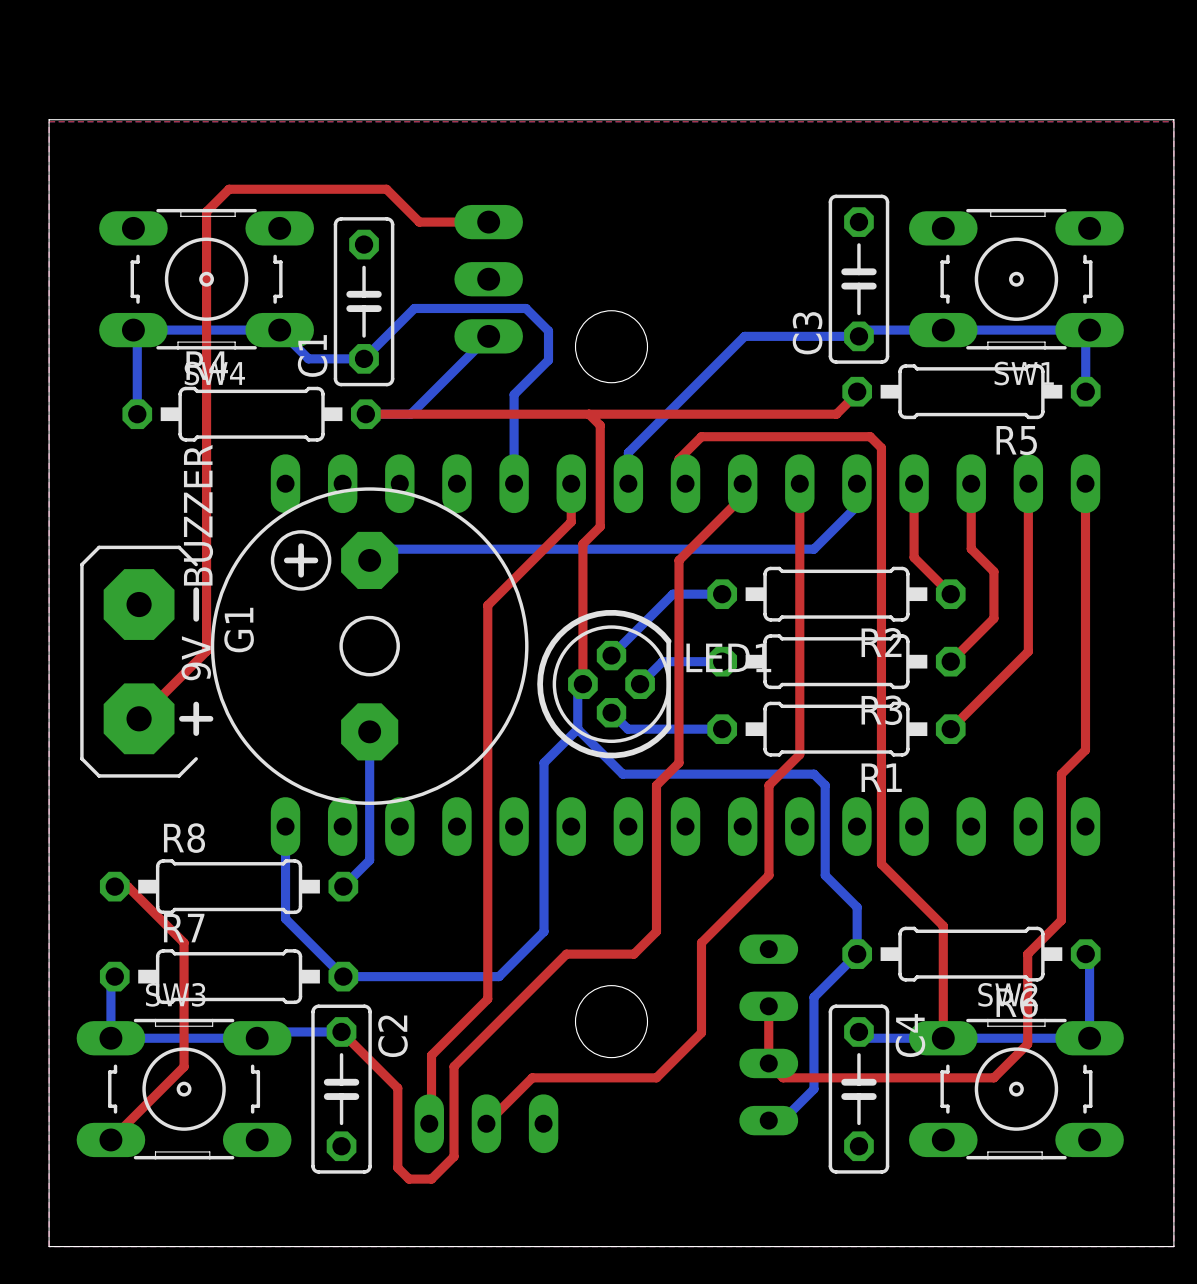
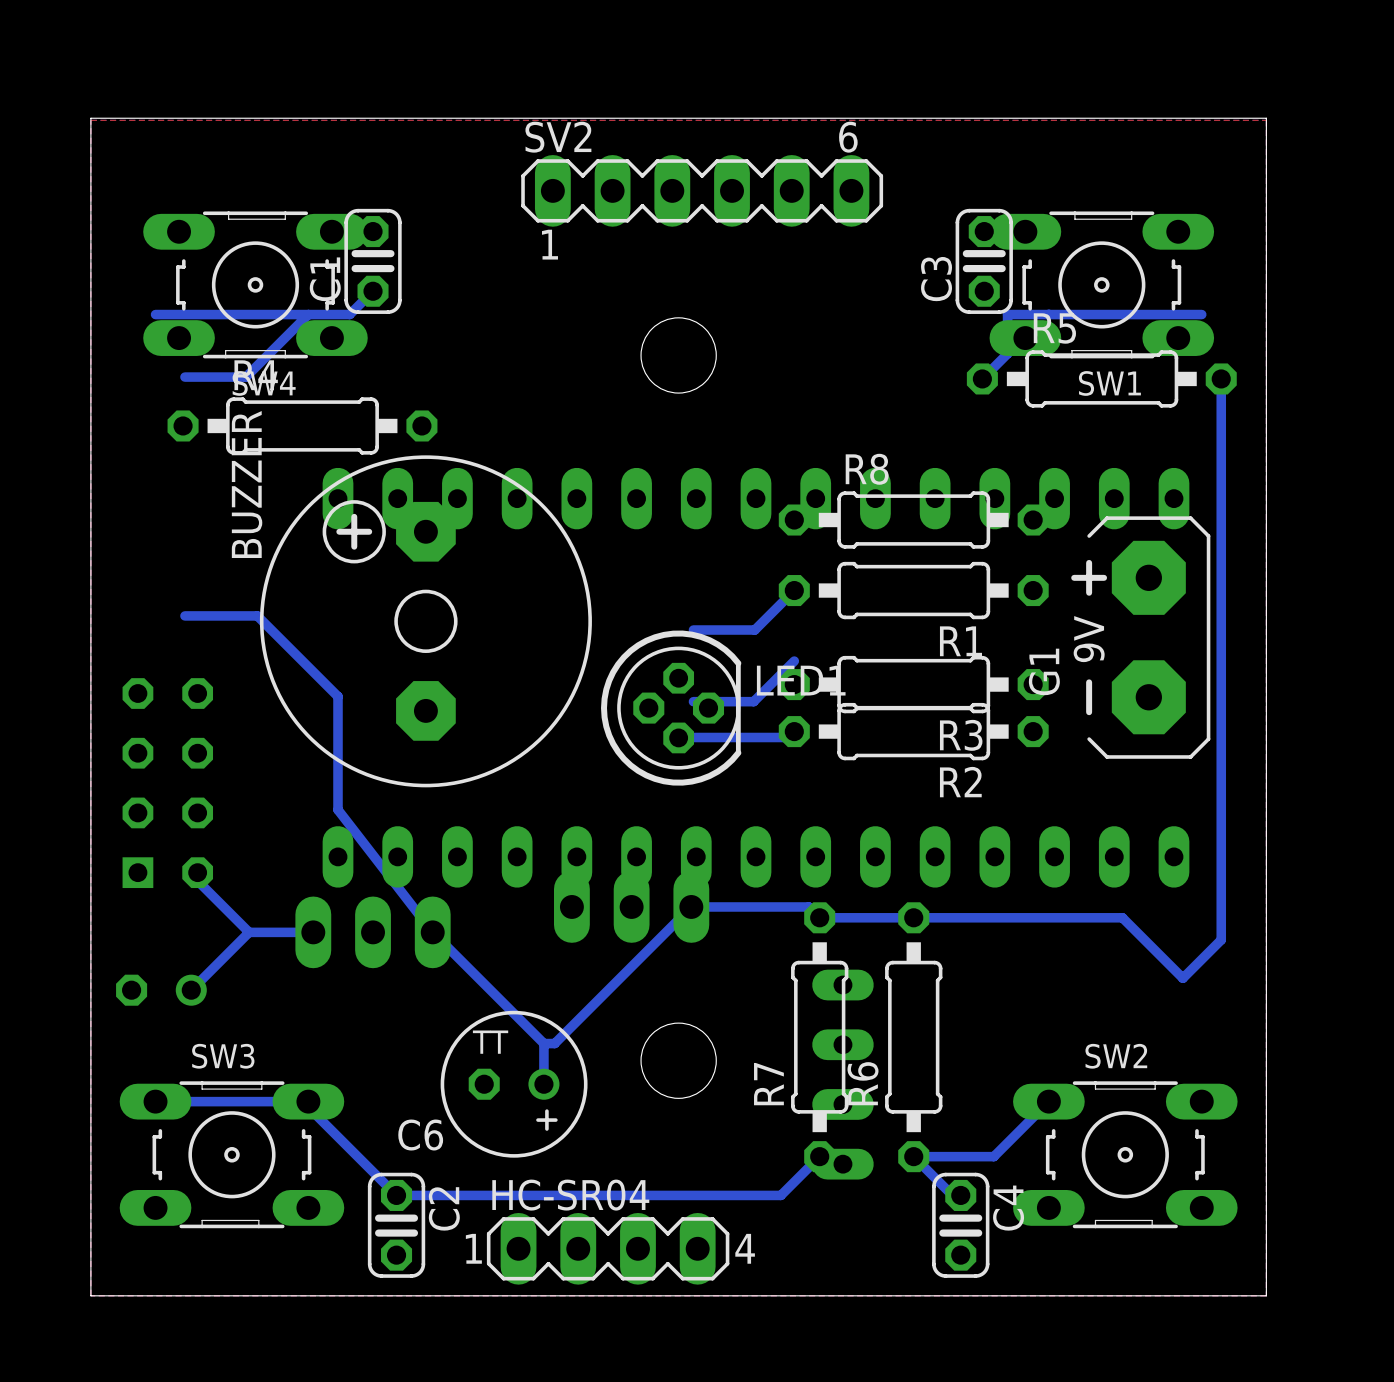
SV2: none -> (702, 190)
C3 footprint: [828, 194, 890, 364] -> [955, 208, 1013, 314]
C1 footprint: [333, 217, 395, 387] -> [344, 208, 402, 314]
top track: (488, 222) (419, 222) (386, 189) (229, 189) (206, 211) (206, 651) (139, 718) -> none
part: (488, 279) -> none
bottom track: none -> (373, 291) (349, 314) (155, 314)
bottom track: none -> (308, 314) (245, 377) (184, 377)
bottom track: none -> (1201, 314) (1007, 314) (1007, 353) (982, 378)
bottom track: (488, 336) (410, 414) (365, 414) -> none
bottom track: none -> (1221, 378) (1221, 939) (1182, 978) (1122, 917) (819, 917) (808, 906) (691, 906) (554, 1043) (543, 1043)
top track: (857, 391) (836, 414) (365, 414) -> none
R5 position: (971, 391) -> (1101, 378)
bottom track: (1085, 391) (1085, 333) (1089, 330) (865, 330) (858, 336) (744, 336) (628, 452) (628, 483) -> none
bottom track: (137, 414) (137, 333) (133, 330) (279, 330) (308, 358) (364, 358) (414, 308) (526, 308) (548, 330) (548, 360) (514, 394) (514, 483) -> none
top track: (589, 414) (600, 425) (600, 526) (582, 544) (582, 684) -> none
R5 name position: R5 (1016, 440) -> R5 (1054, 328)
top track: (571, 483) (571, 521) (487, 605) (487, 999) (431, 1055) (431, 1121) (429, 1123) -> none
top track: (685, 483) (678, 477) (678, 459) (701, 436) (870, 436) (881, 447) (881, 864) (943, 925) (943, 1038) -> none
top track: (742, 483) (742, 496) (678, 560) (678, 762) (656, 785) (656, 931) (634, 954) (566, 954) (454, 1066) (454, 1156) (431, 1179) (409, 1179) (397, 1167) (397, 1088) (341, 1031) -> none
top track: (799, 483) (799, 754) (768, 785) (768, 875) (701, 942) (701, 1032) (656, 1077) (532, 1077) (486, 1123) -> none
bottom track: (856, 483) (856, 506) (813, 549) (380, 549) (369, 560) -> none
top track: (914, 483) (914, 557) (950, 594) -> none
top track: (971, 483) (971, 548) (993, 571) (993, 618) (950, 661) -> none
top track: (1028, 483) (1028, 651) (950, 729) -> none
top track: (1085, 483) (1085, 750) (1061, 774) (1061, 920) (1027, 954) (1027, 1044) (993, 1077) (783, 1077) (768, 1063) (768, 1006) -> none
G1 footprint: [80, 545, 214, 778] -> [1071, 516, 1211, 759]
bottom track: none -> (794, 590) (754, 630) (693, 630)
bottom track: (722, 594) (672, 594) (611, 655) -> none
R2 position: (836, 594) -> (913, 731)
bottom track: none -> (184, 615) (257, 615) (337, 696) (337, 809) (432, 932) (543, 1043)
G1 name position: G1 (239, 630) -> G1 (1044, 671)
bottom track: none -> (794, 661) (753, 701) (693, 701)
BUZZER position: (369, 646) -> (425, 621)
bottom track: (722, 661) (662, 661) (640, 684) -> none
bottom track: (582, 684) (577, 689) (577, 729) -> none
bottom track: none -> (794, 731) (788, 737) (693, 737)
bottom track: (611, 712) (627, 729) (722, 729) -> none
bottom track: (577, 729) (622, 774) (813, 774) (825, 785) (825, 875) (857, 907) (857, 954) (813, 997) (813, 1089) (782, 1120) (768, 1120) -> none
bottom track: (577, 729) (544, 762) (544, 931) (499, 976) (343, 976) (285, 918) (285, 826) -> none
R1 position: (836, 729) -> (913, 590)
bottom track: (369, 731) (369, 860) (343, 886) -> none
part: none -> (167, 783)
bottom track: none -> (197, 872) (197, 880) (249, 932)
part: none -> (631, 906)
top track: (114, 886) (127, 886) (184, 942) (184, 1066) (110, 1139) -> none
R8 position: (229, 886) -> (913, 520)
bottom track: none -> (249, 932) (313, 932)
bottom track: none -> (249, 932) (191, 990)
part: none -> (373, 932)
R7 name position: R7 (184, 928) -> R7 (768, 1084)
part: none -> (161, 990)
R6 rotation: 0° (971, 954) -> 90° clockwise (913, 1037)
bottom track: (1085, 954) (1089, 957) (1089, 1038) (865, 1038) (858, 1031) -> none
bottom track: (114, 976) (110, 980) (110, 1038) (257, 1038) (263, 1031) (341, 1031) -> none
R7 rotation: 0° (229, 976) -> 90° clockwise (819, 1037)
R7 position: (229, 976) -> (819, 1037)
C2 footprint: [311, 1004, 372, 1174] -> [367, 1172, 426, 1278]
C4 footprint: [828, 1004, 890, 1174] -> [932, 1172, 990, 1278]
bottom track: none -> (543, 1043) (543, 1084)
C6: none -> (514, 1084)
bottom track: none -> (155, 1101) (308, 1101) (308, 1107) (396, 1195) (780, 1195) (819, 1156)
bottom track: none -> (1048, 1101) (993, 1156) (913, 1156) (952, 1195) (960, 1195)
SW3 position: (184, 1089) -> (231, 1154)
SW2 position: (1016, 1089) -> (1125, 1154)
part: (486, 1123) -> none
HC-SR04: none -> (608, 1248)

